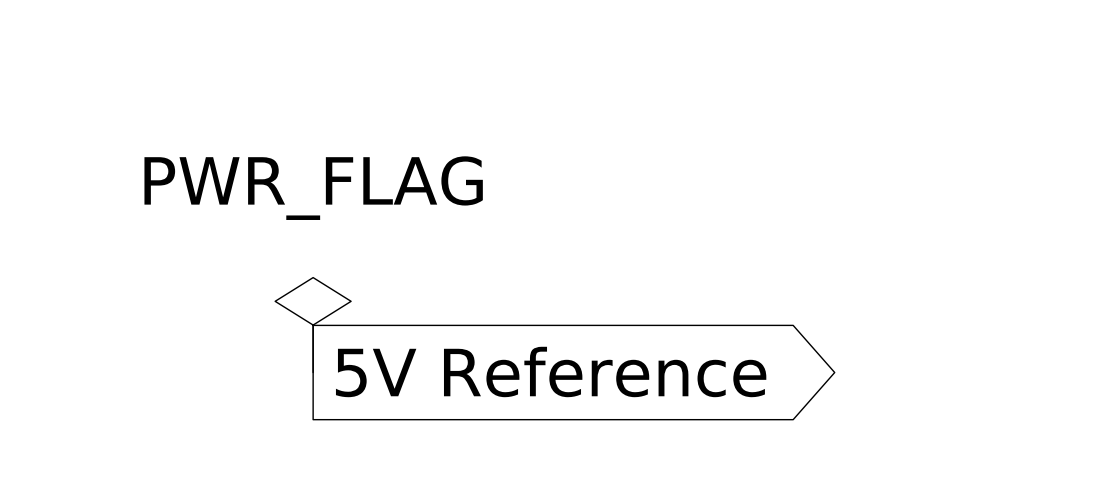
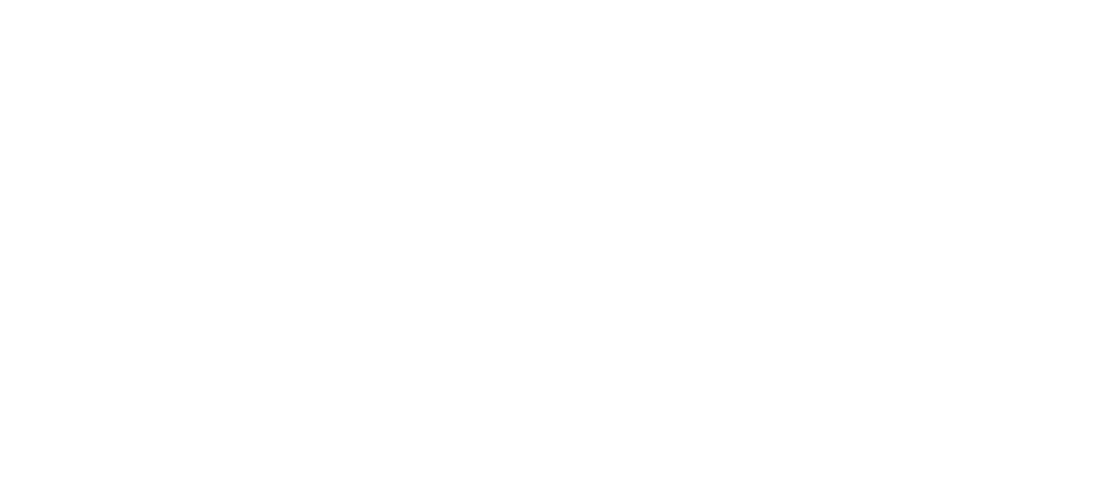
power symbol: PWR_FLAG (313, 325) -> none
global label: 5V Reference (551, 371) -> none

